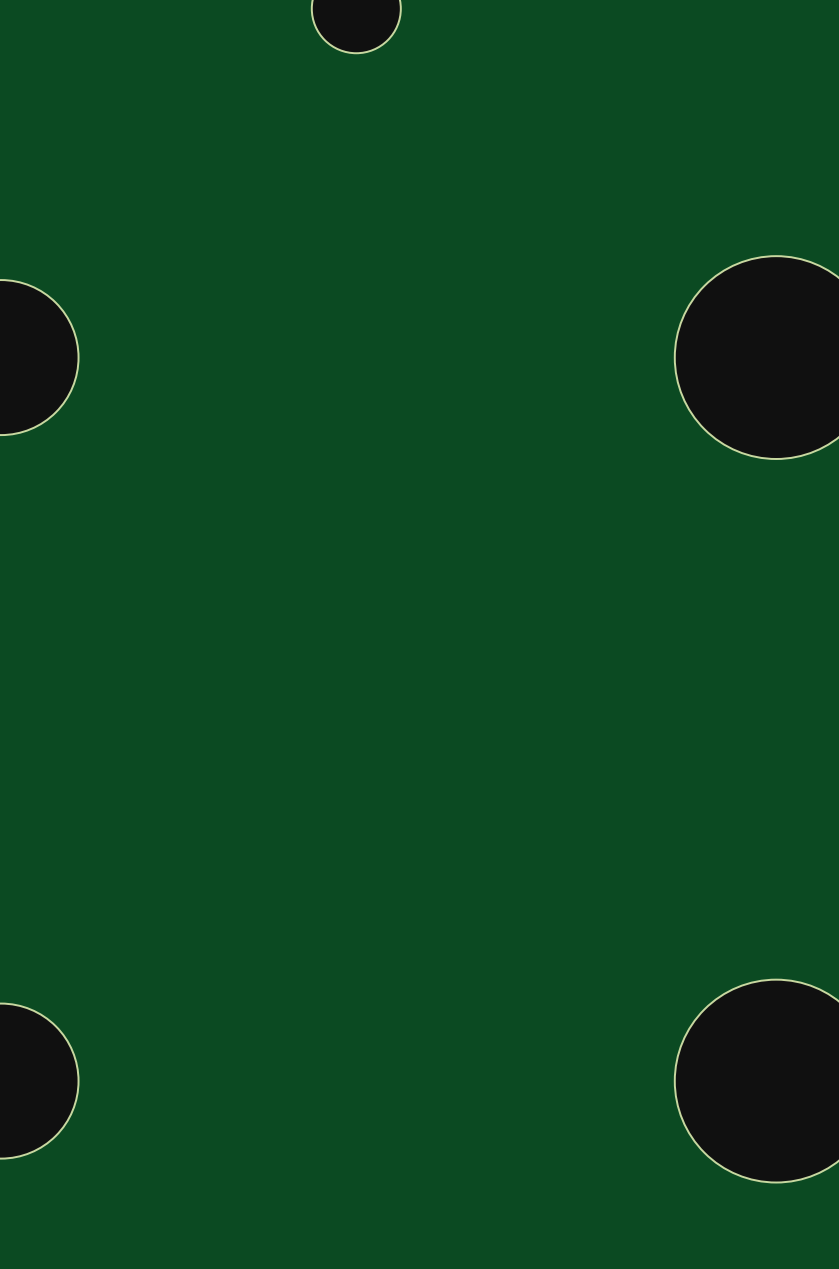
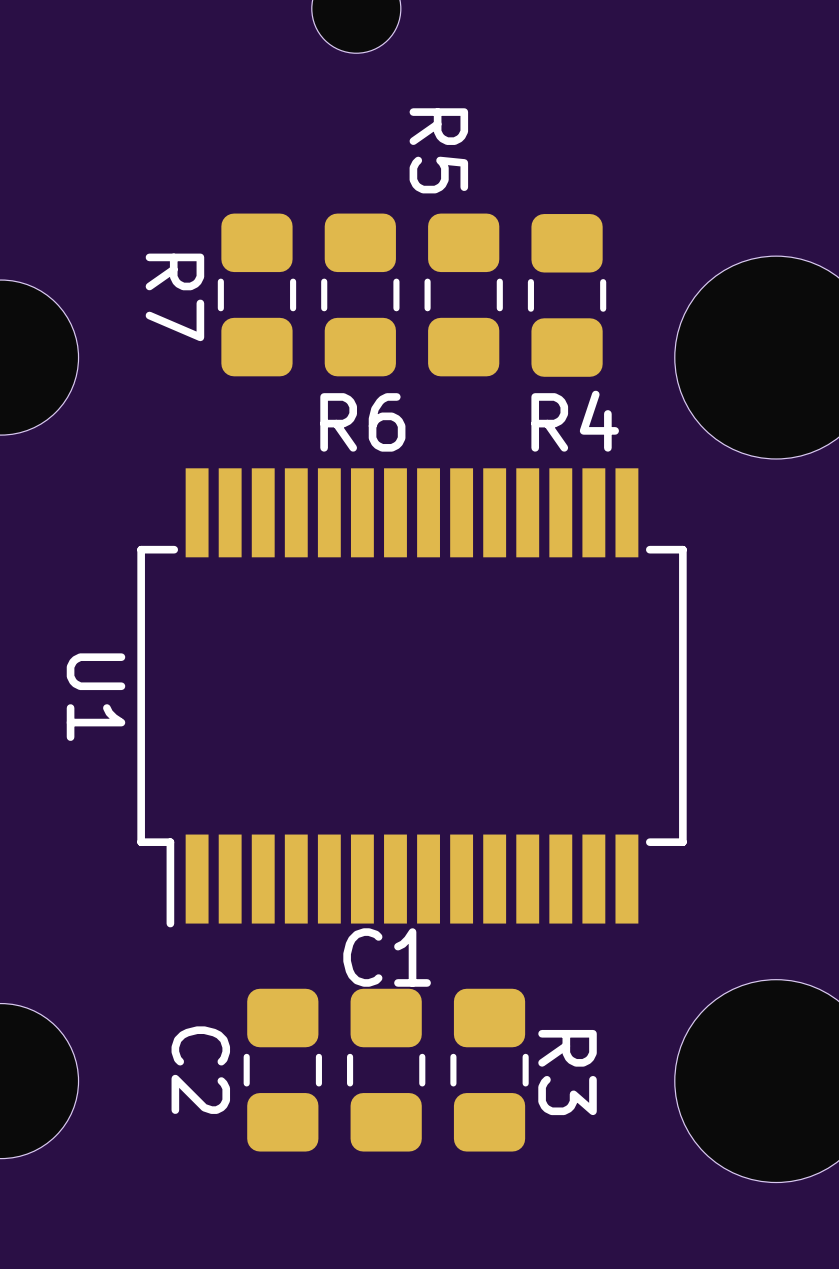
R7: none -> (256, 294)
R6: none -> (360, 294)
R5: none -> (463, 294)
R4: none -> (567, 295)
U1: none -> (412, 697)
C2: none -> (282, 1070)
C1: none -> (386, 1070)
R3: none -> (489, 1070)

